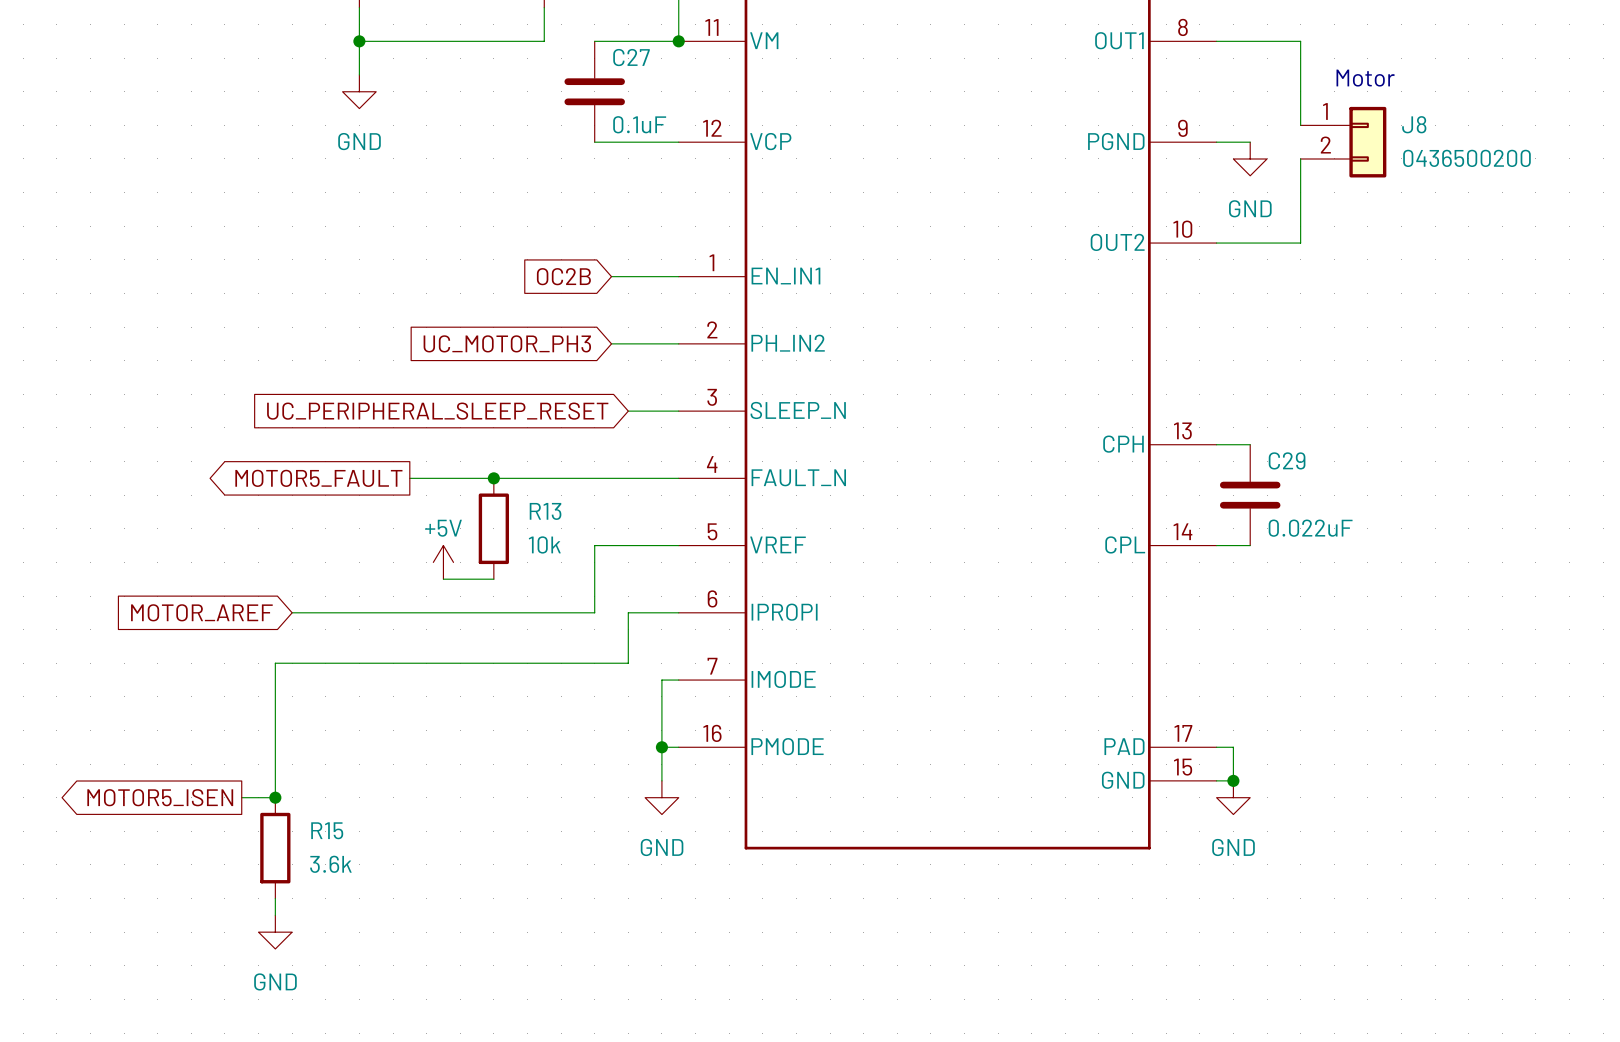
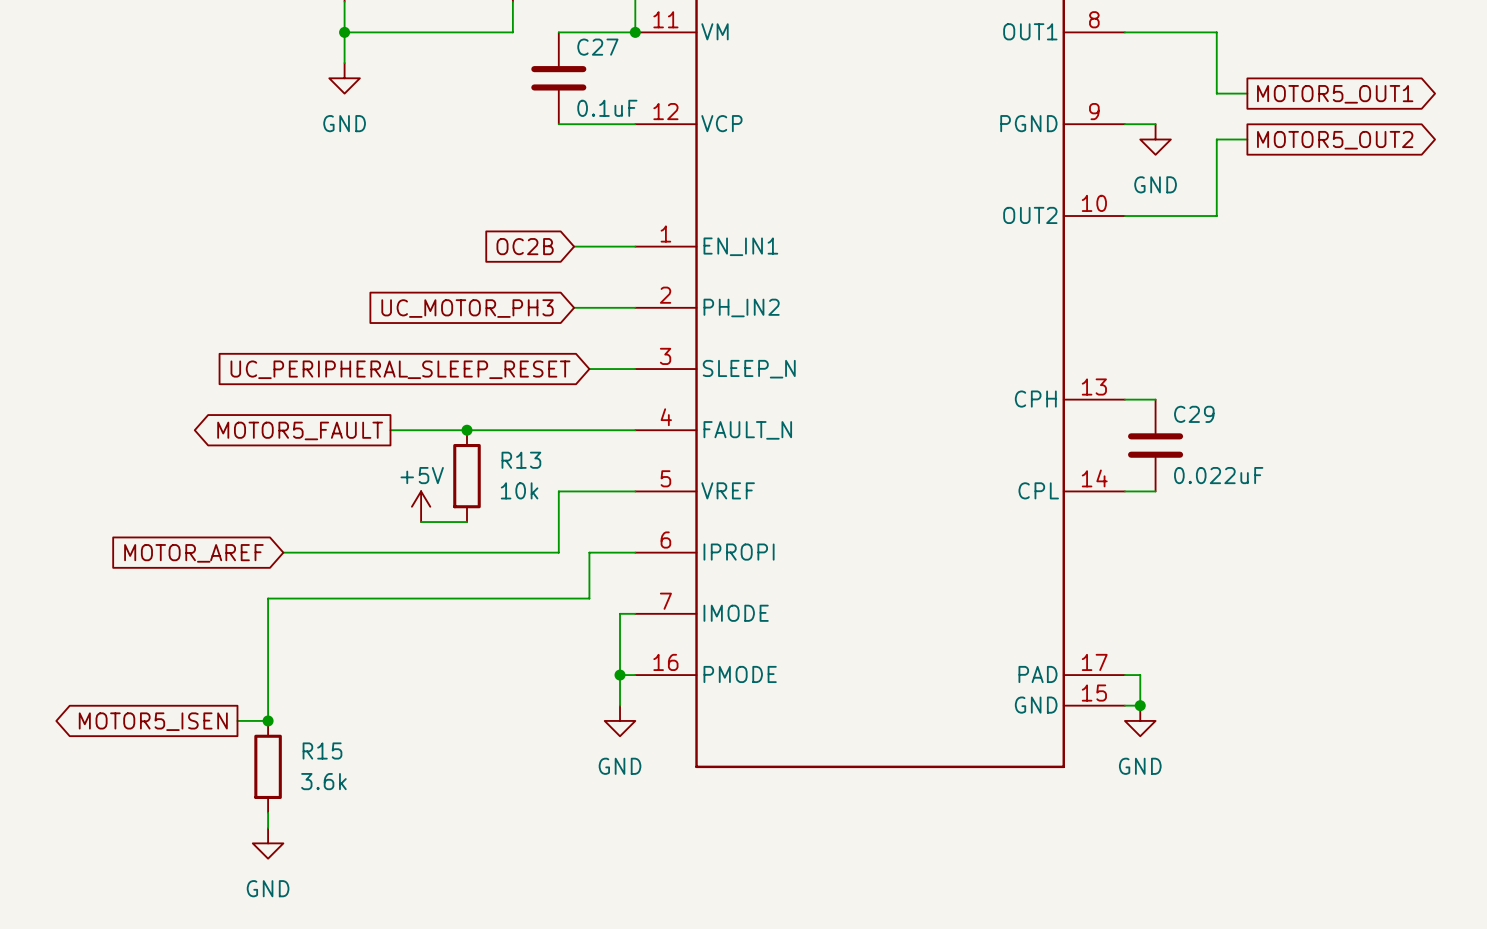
wire: (1300, 41) (1300, 125) -> (1201, 32) (1216, 32) (1216, 93) (1247, 93)
text: Motor (1365, 78) -> none
global label: none -> MOTOR5_OUT1 (1335, 94)
J8: 0436500200 (1343, 142) -> none
wire: (1300, 158) (1300, 243) -> (1247, 139) (1216, 139) (1216, 216) (1201, 216)
global label: none -> MOTOR5_OUT2 (1335, 140)

